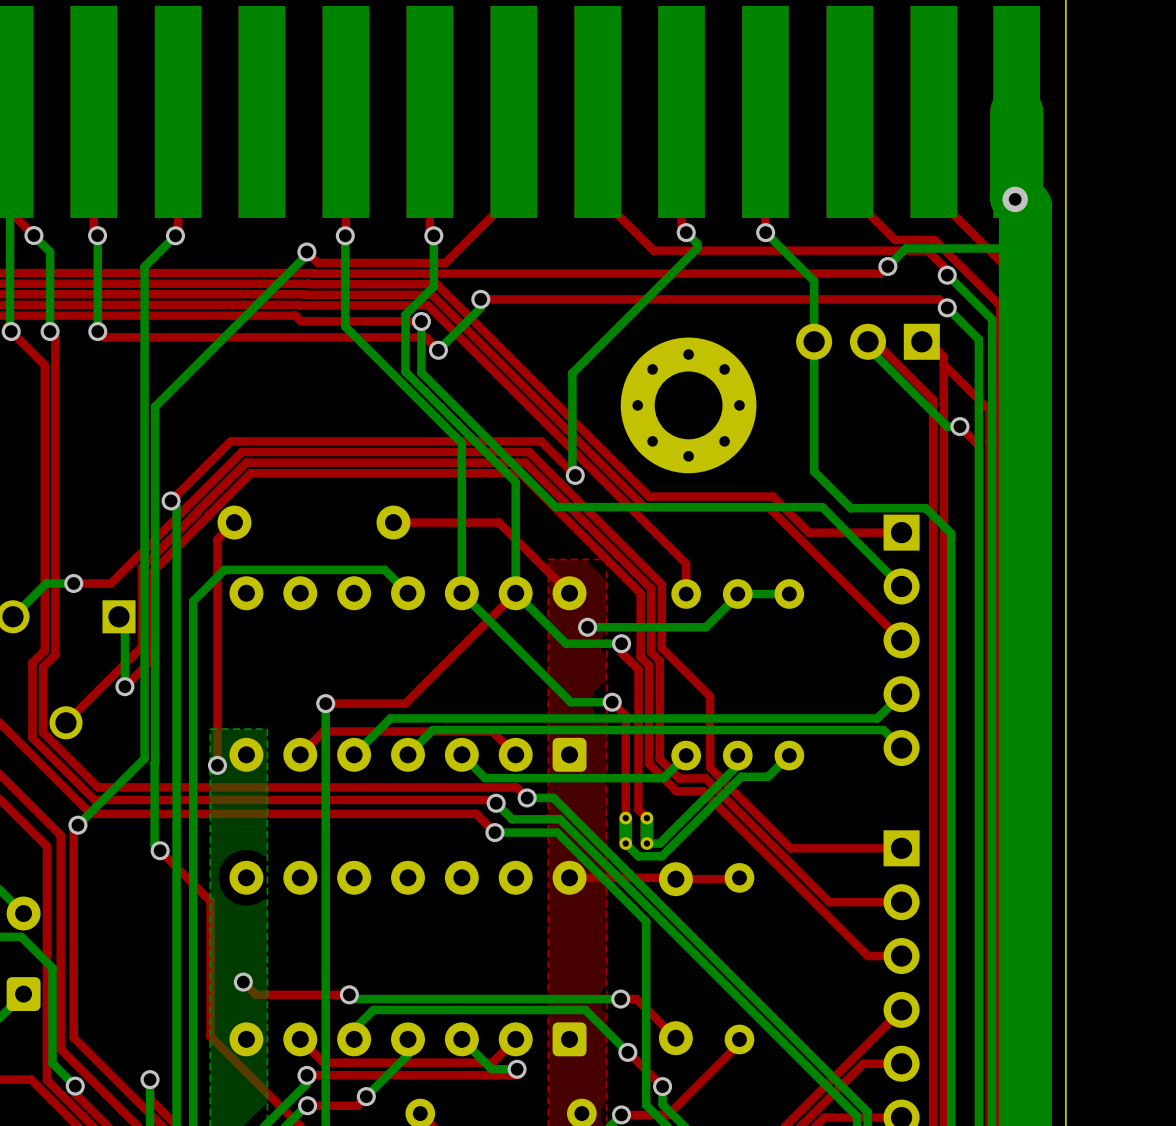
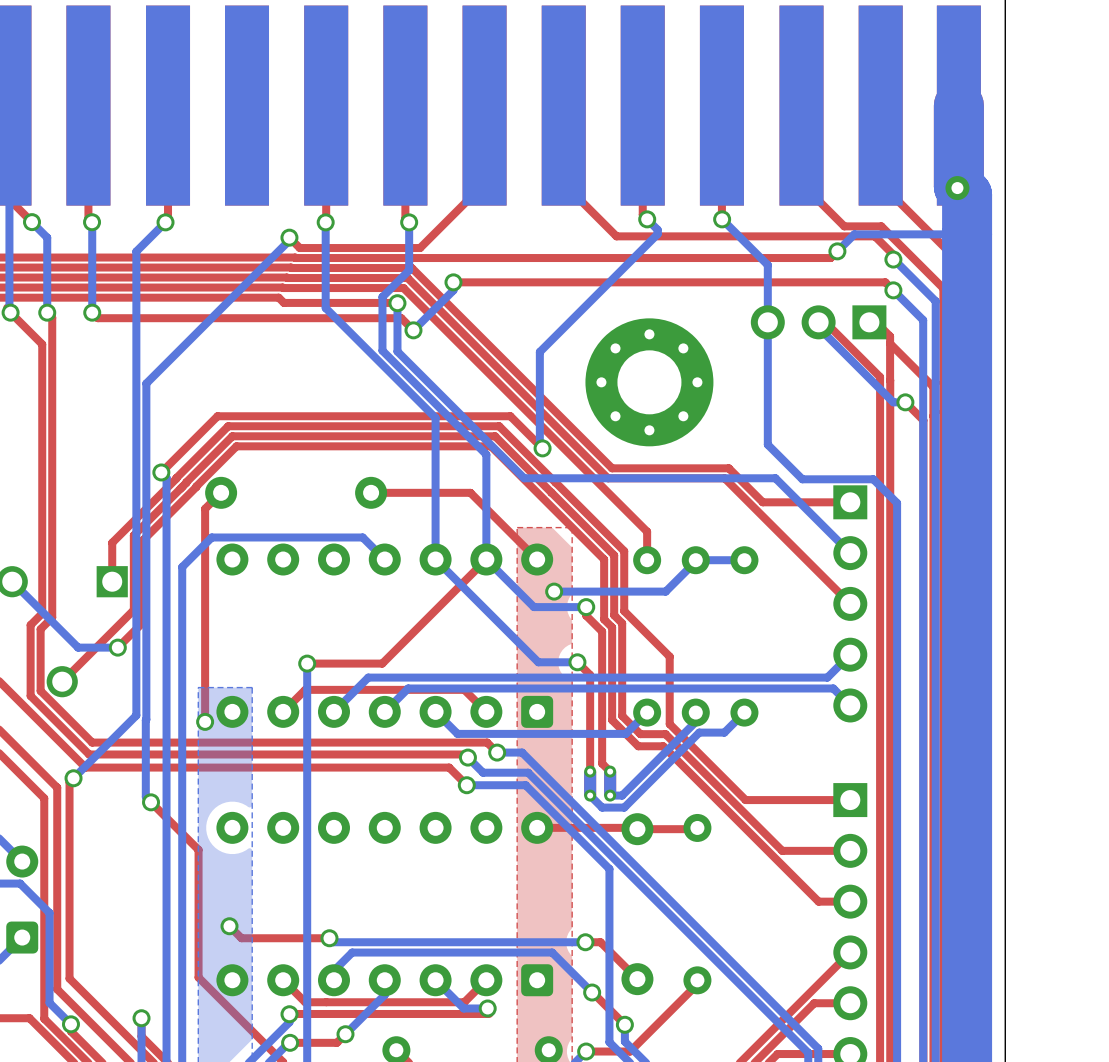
top track: (118, 575) (111, 583) (73, 583) -> (112, 542) (112, 581)
bottom track: (73, 583) (46, 583) (12, 616) -> none
via: (73, 583) -> none
bottom track: (118, 616) (124, 622) (124, 686) -> (12, 581) (78, 647) (117, 647)

